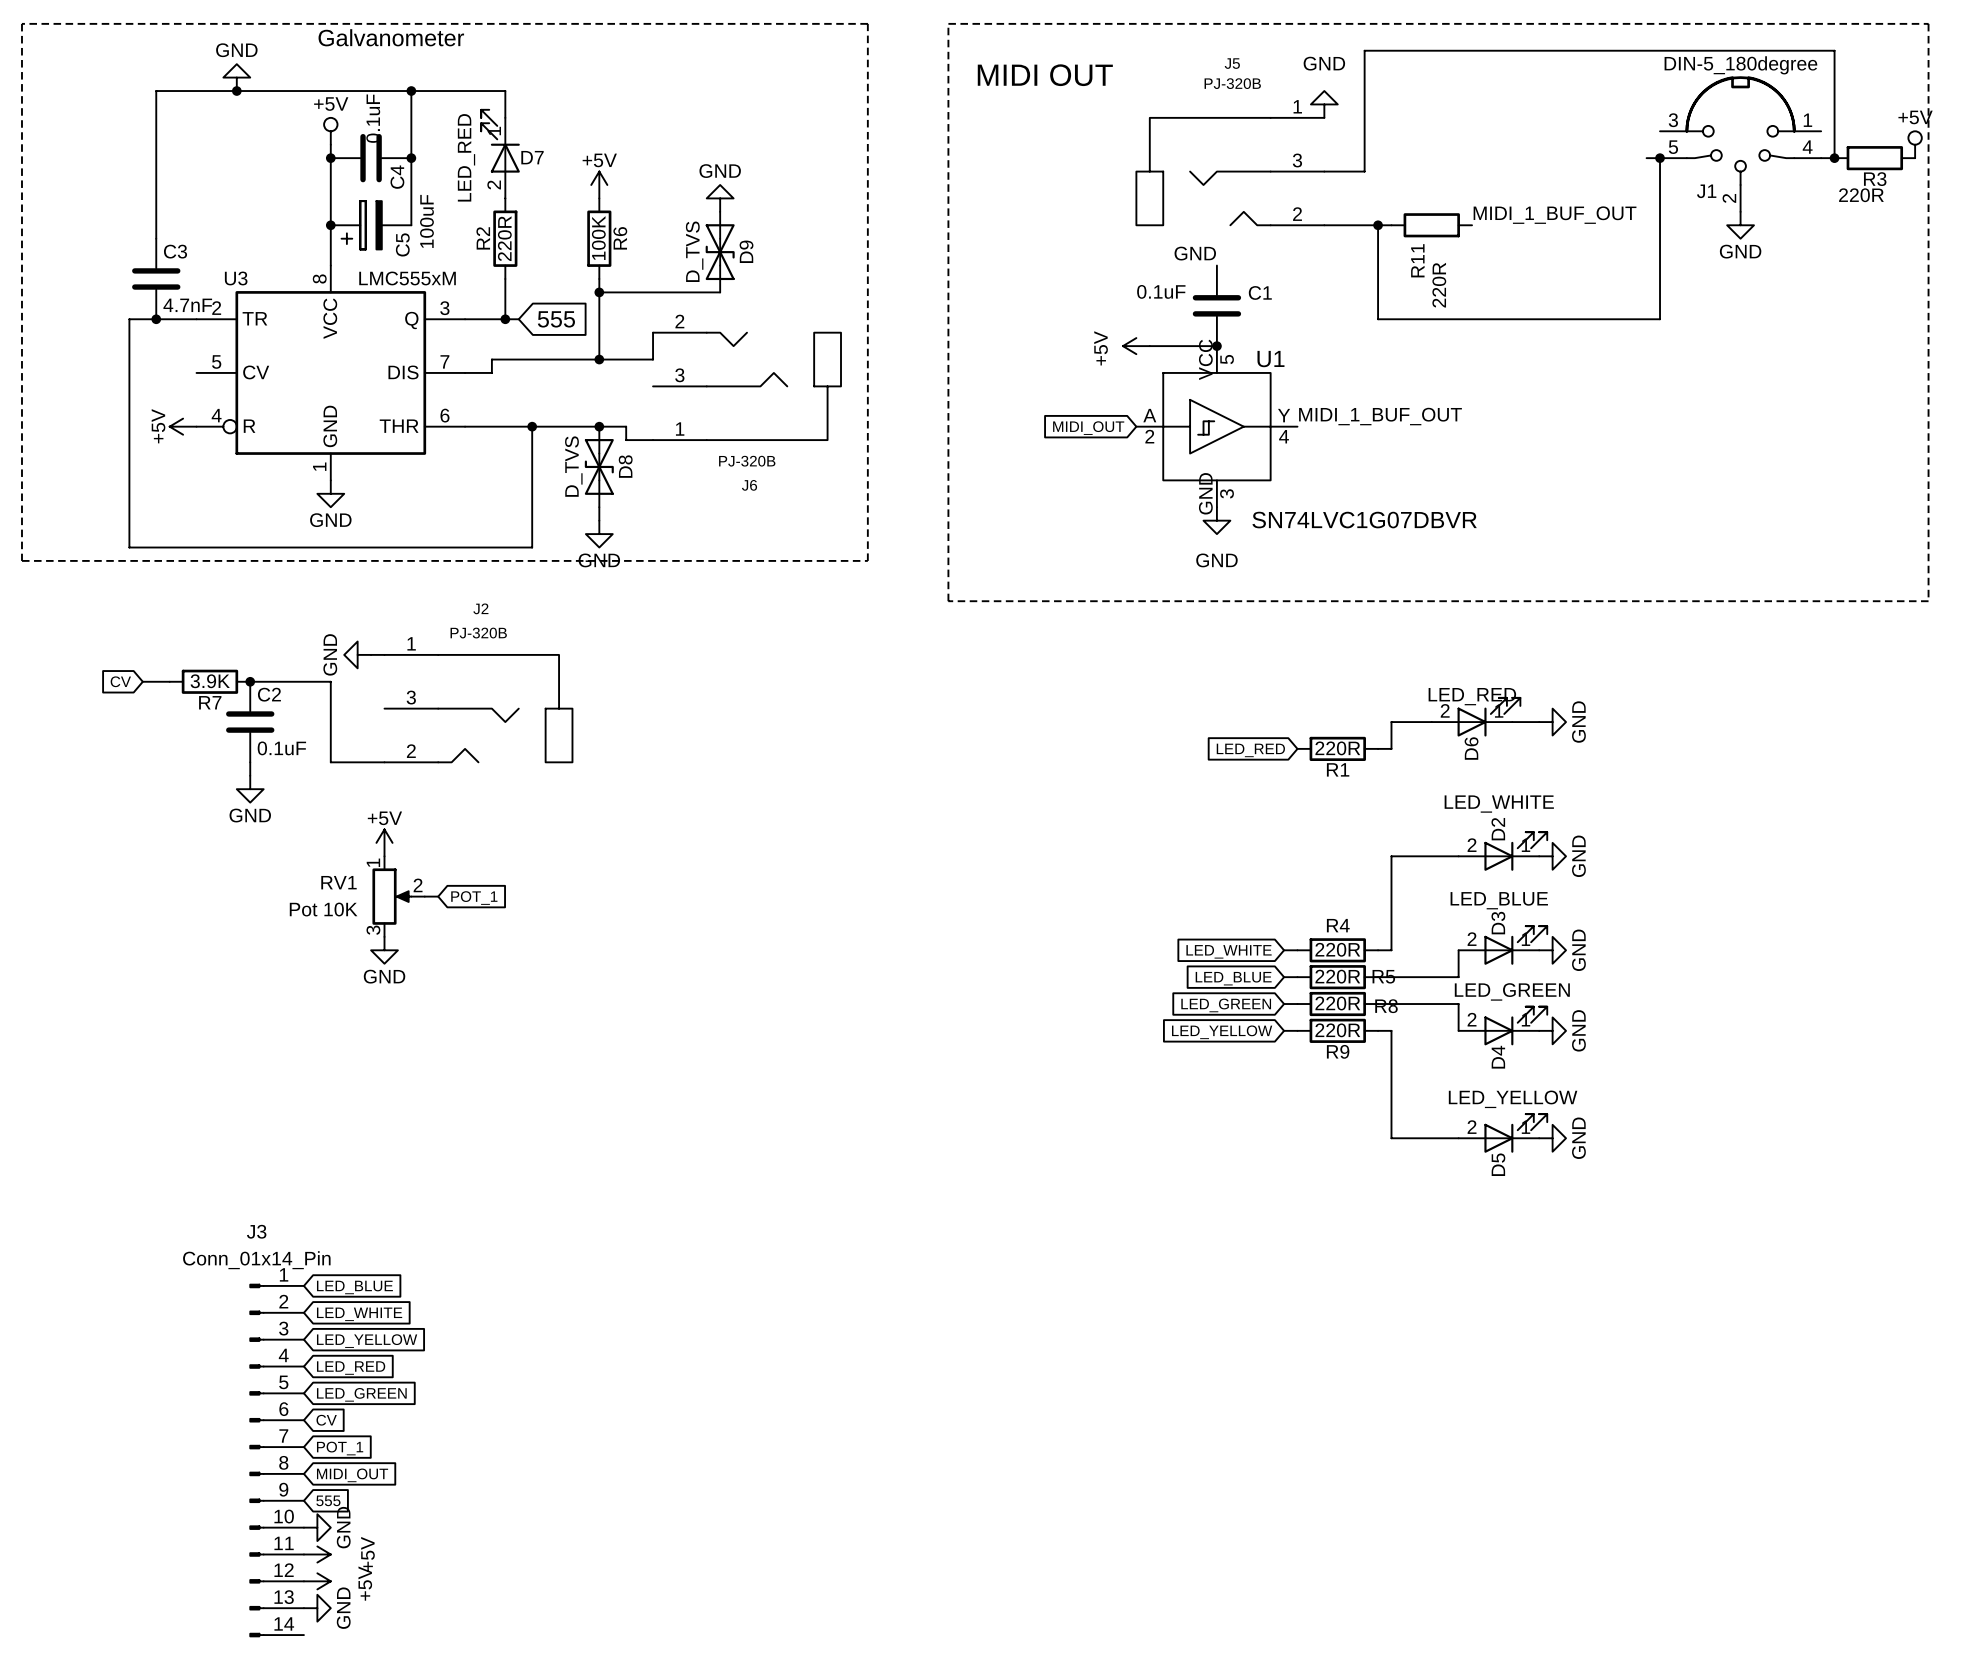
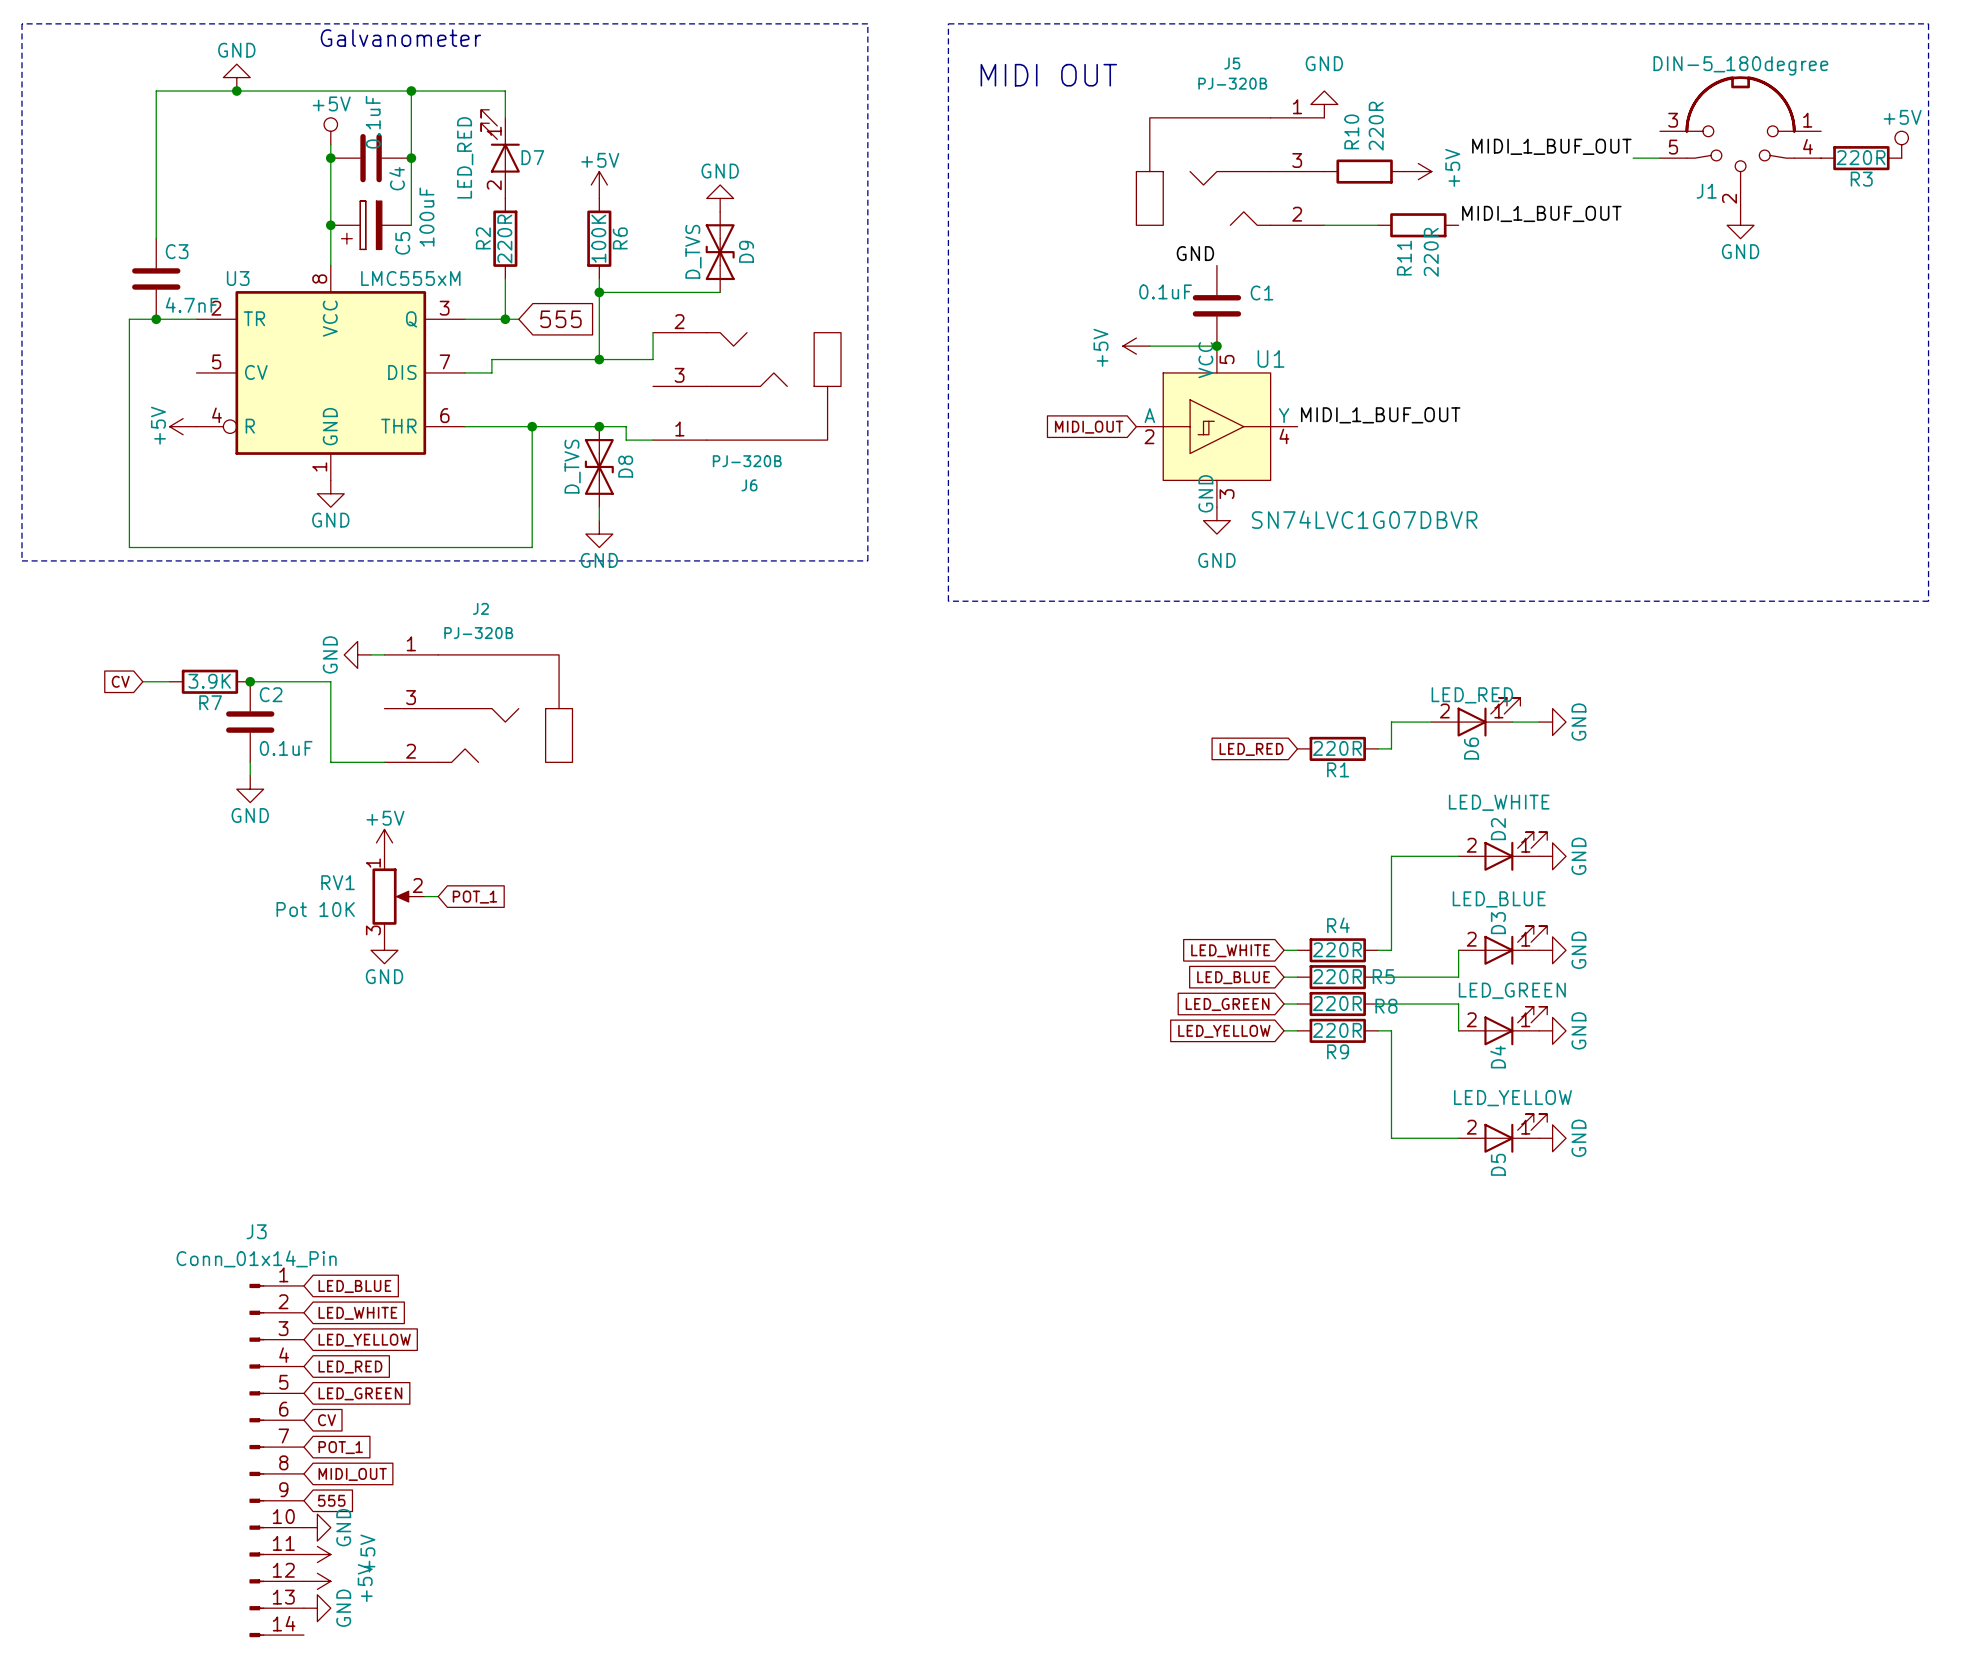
power symbol position: +5V (1915, 144) -> +5V (1901, 144)
label: none -> MIDI_1_BUF_OUT (1551, 146)
wire: none -> (1633, 158) (1646, 158)
wire: (1660, 158) (1660, 319) (1378, 319) (1378, 225) (1391, 225) -> none
junction: (1660, 158) -> none
wire: (1821, 158) (1834, 158) (1834, 50) (1364, 50) (1364, 171) (1324, 171) -> none
junction: (1834, 158) -> none
R3 position: (1874, 158) -> (1861, 158)
R10: none -> 220R (1364, 171)
power symbol: none -> +5V (1418, 171)
R3 value position: 220R (1861, 195) -> 220R (1861, 157)
label position: MIDI_1_BUF_OUT (1555, 215) -> MIDI_1_BUF_OUT (1541, 213)
junction: (1378, 225) -> none
R11 position: (1431, 225) -> (1418, 225)
R11 value position: 220R (1439, 285) -> 220R (1431, 252)

